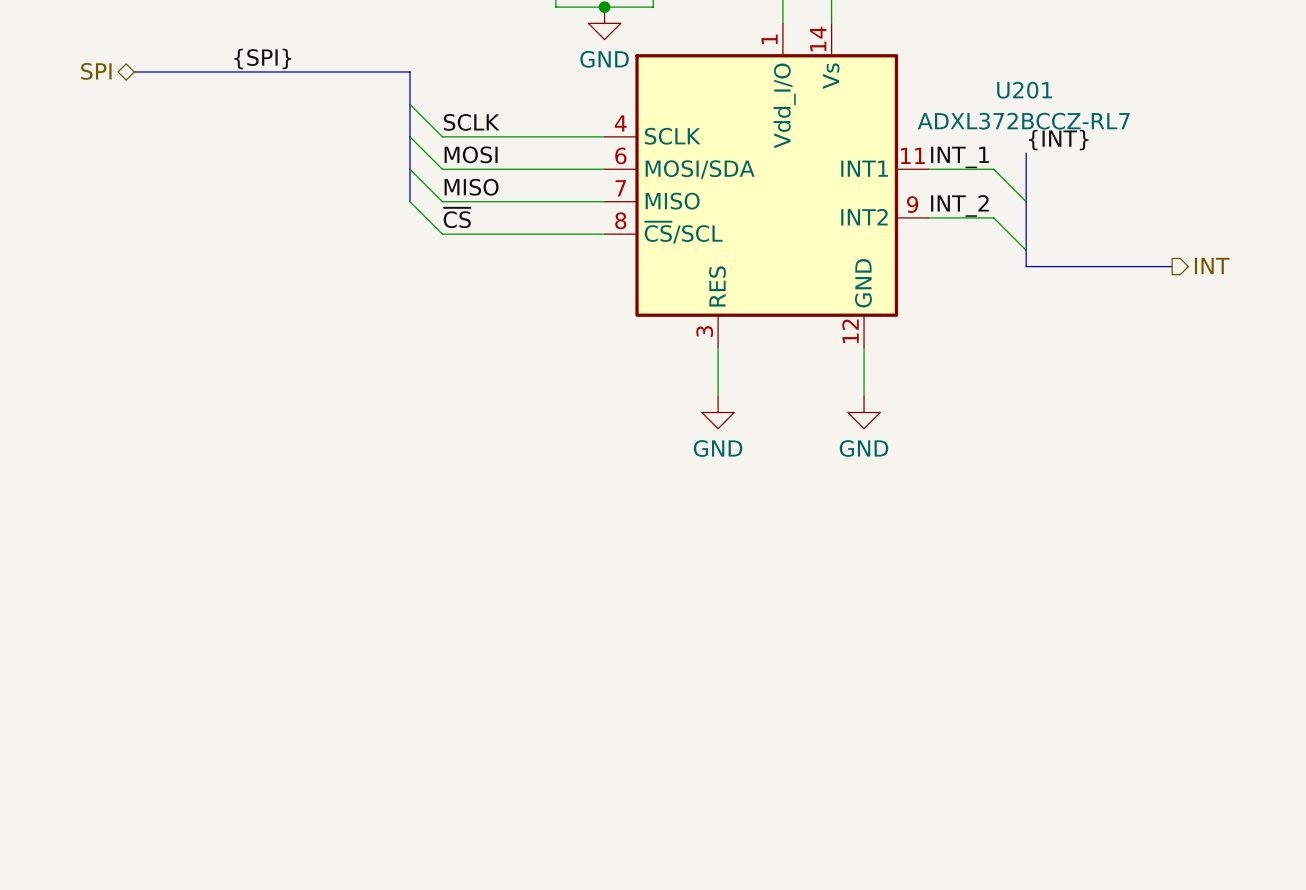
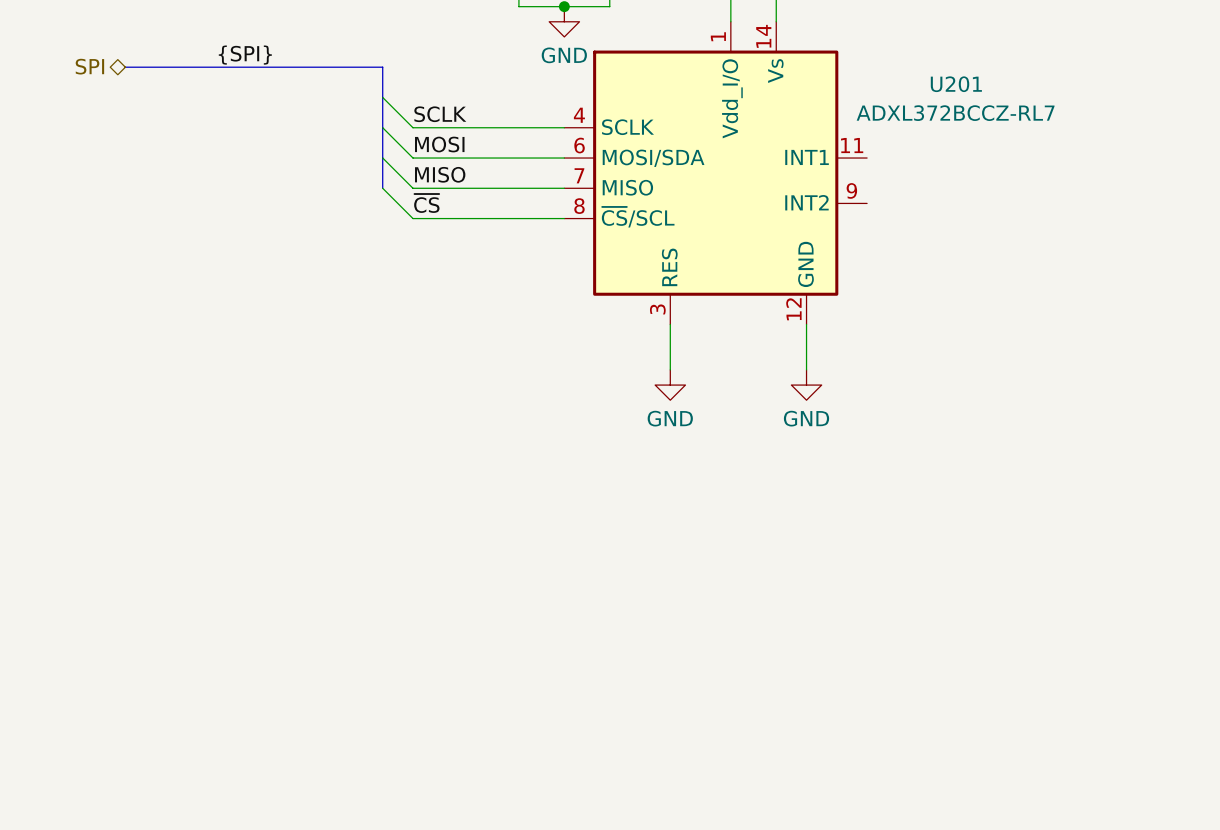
label: {INT} (1058, 140) -> none
bus: (1026, 153) (1026, 266) (1172, 266) -> none
label: INT_1 (959, 157) -> none
wire: (928, 169) (993, 169) (1026, 201) -> none
label: INT_2 (959, 205) -> none
wire: (928, 217) (993, 217) (1026, 250) -> none
hierarchical label: INT (1212, 265) -> none

